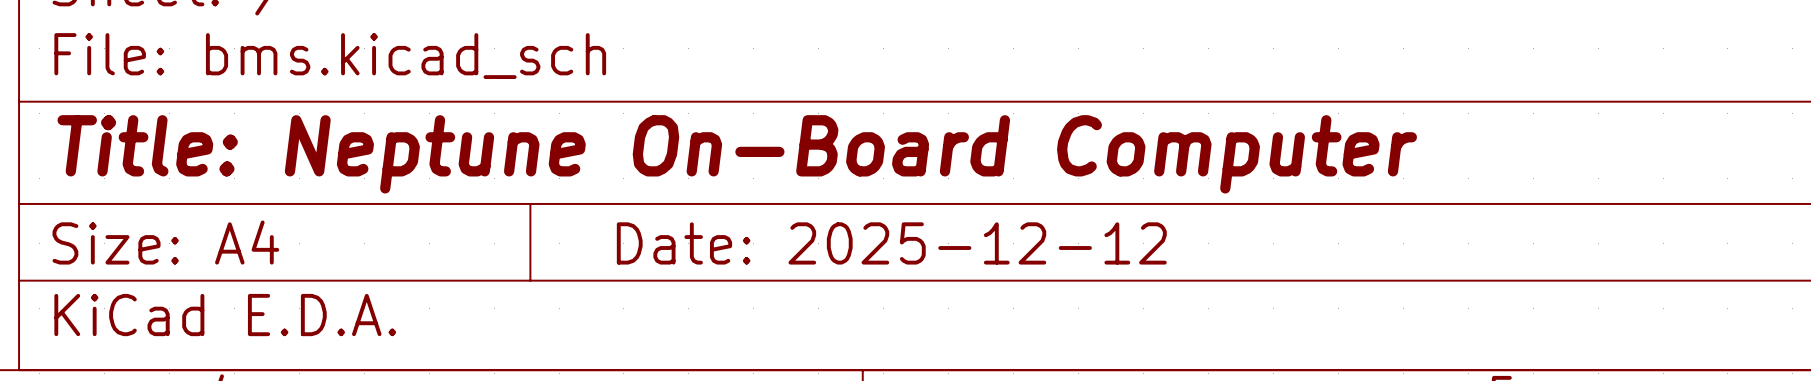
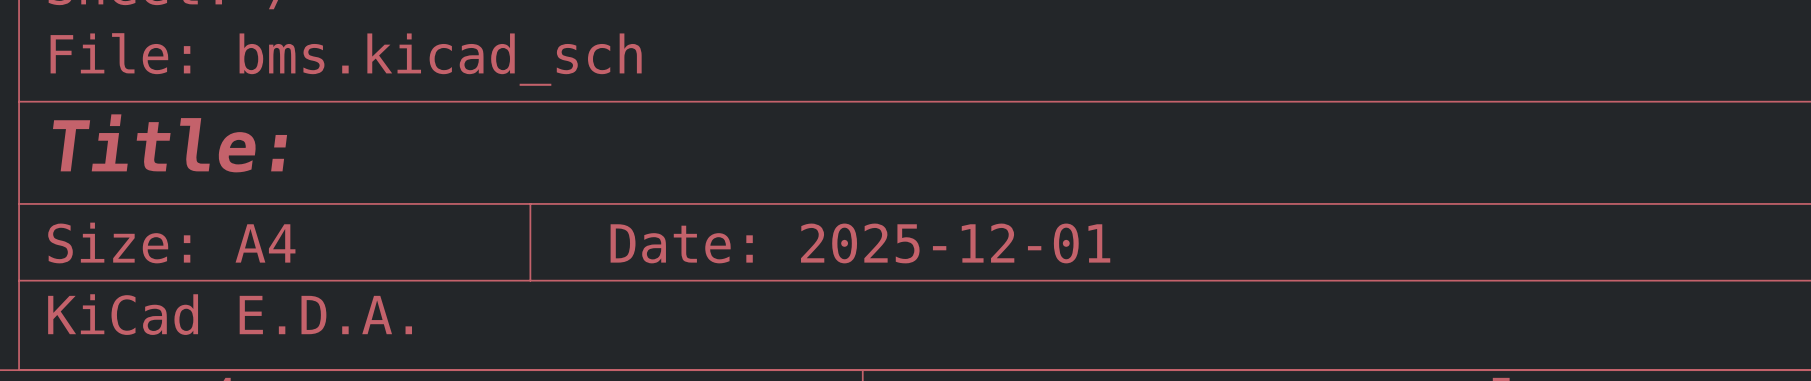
title block: Title: Neptune On-Board Computer (737, 154) -> Title: (170, 143)
title block: Date: 2025-12-12 (891, 243) -> Date: 2025-12-01 (860, 243)

